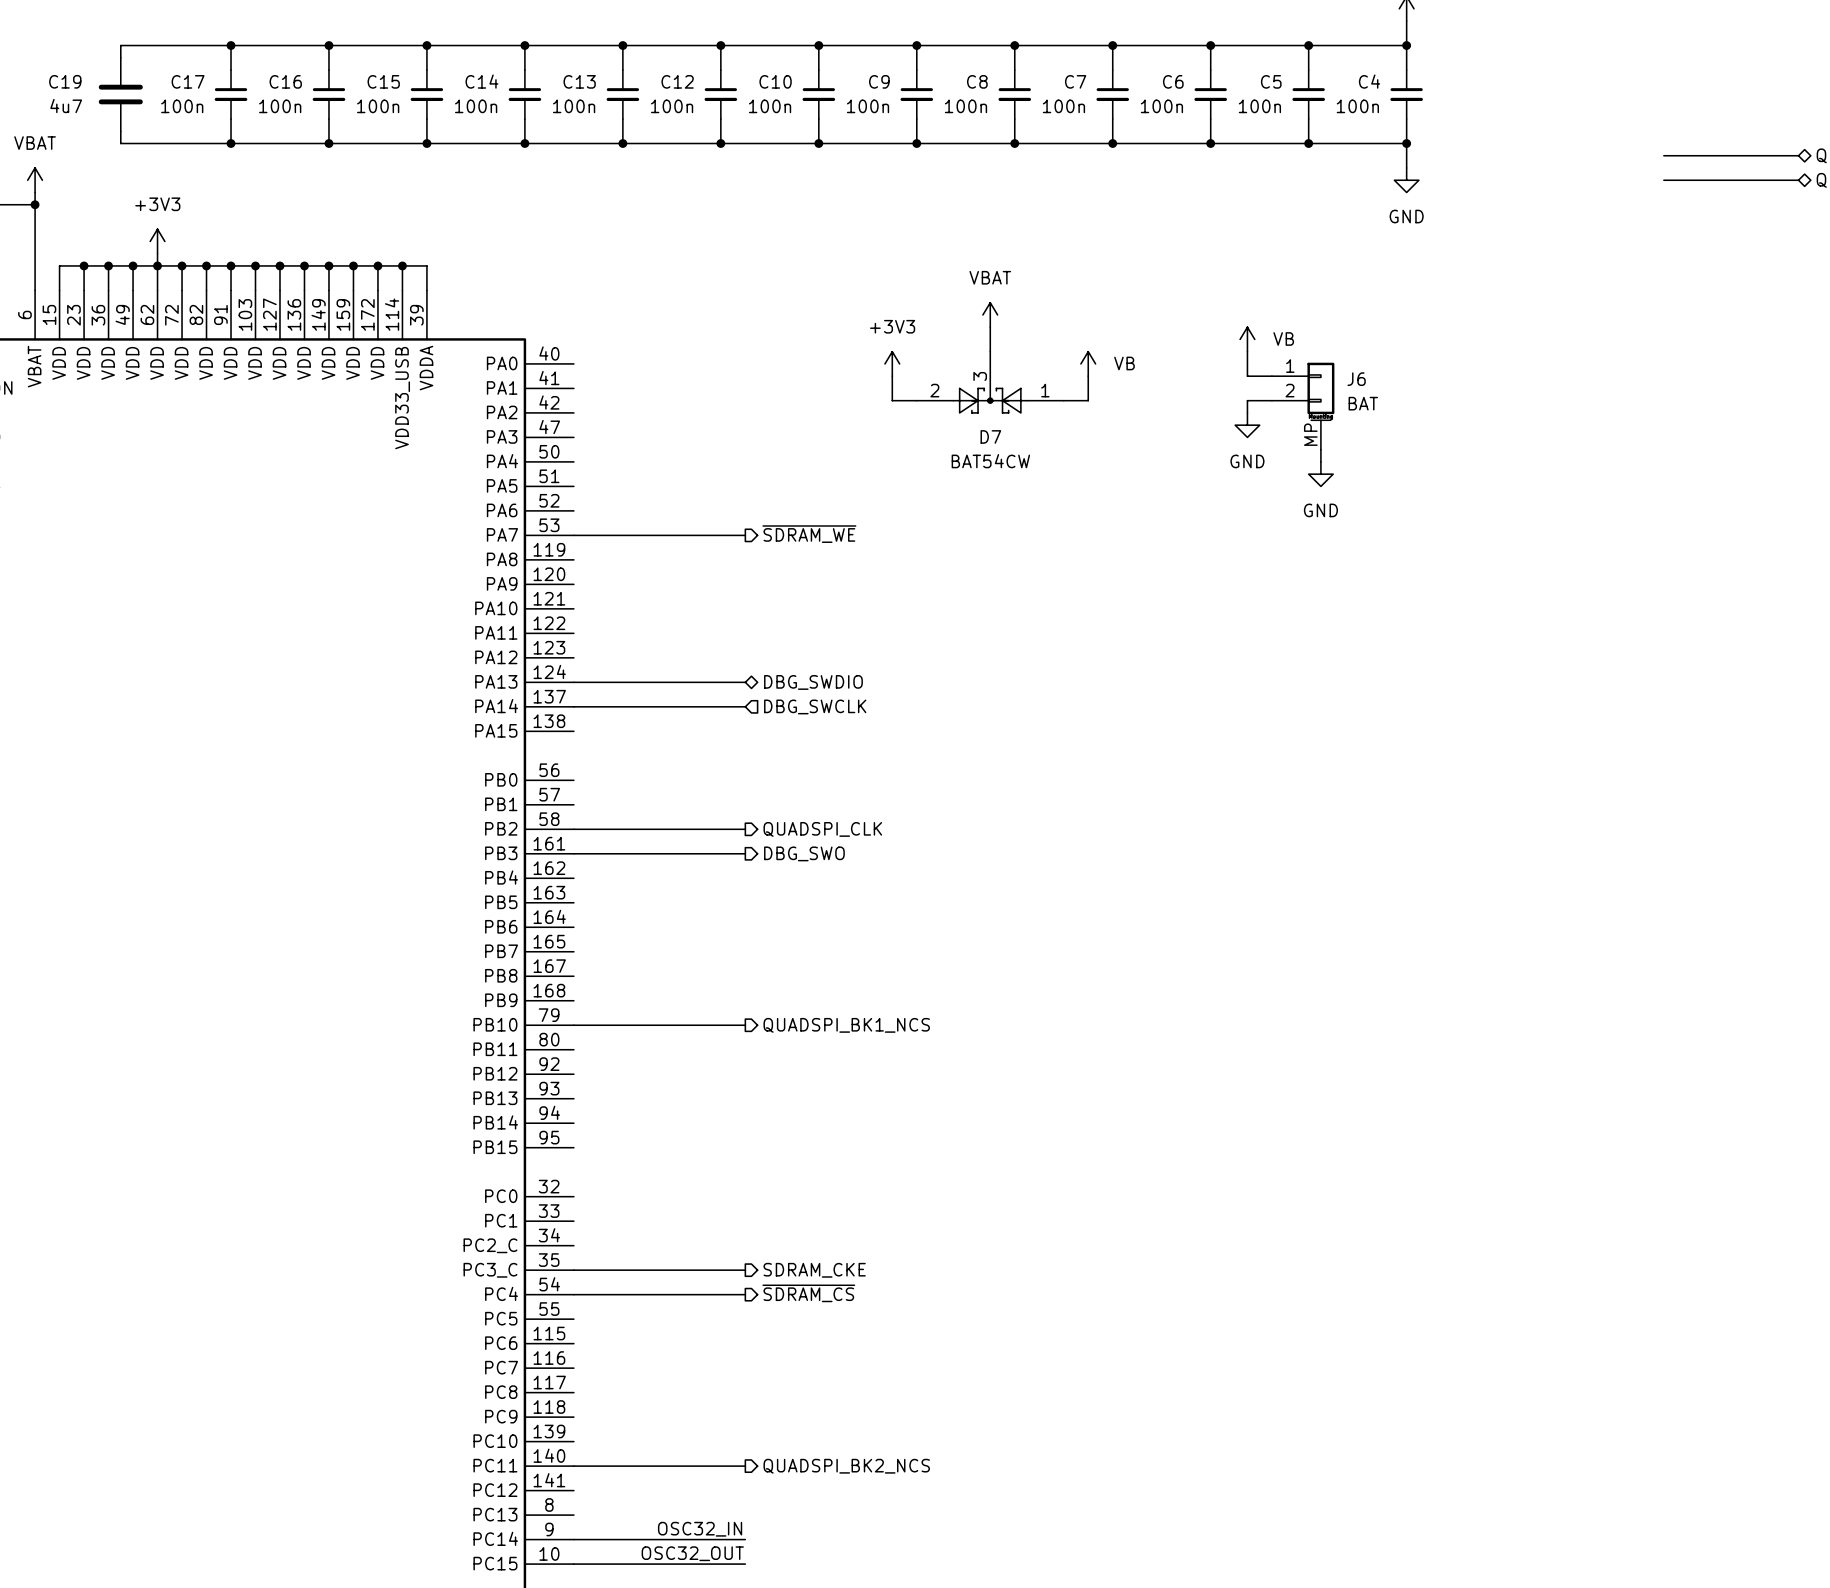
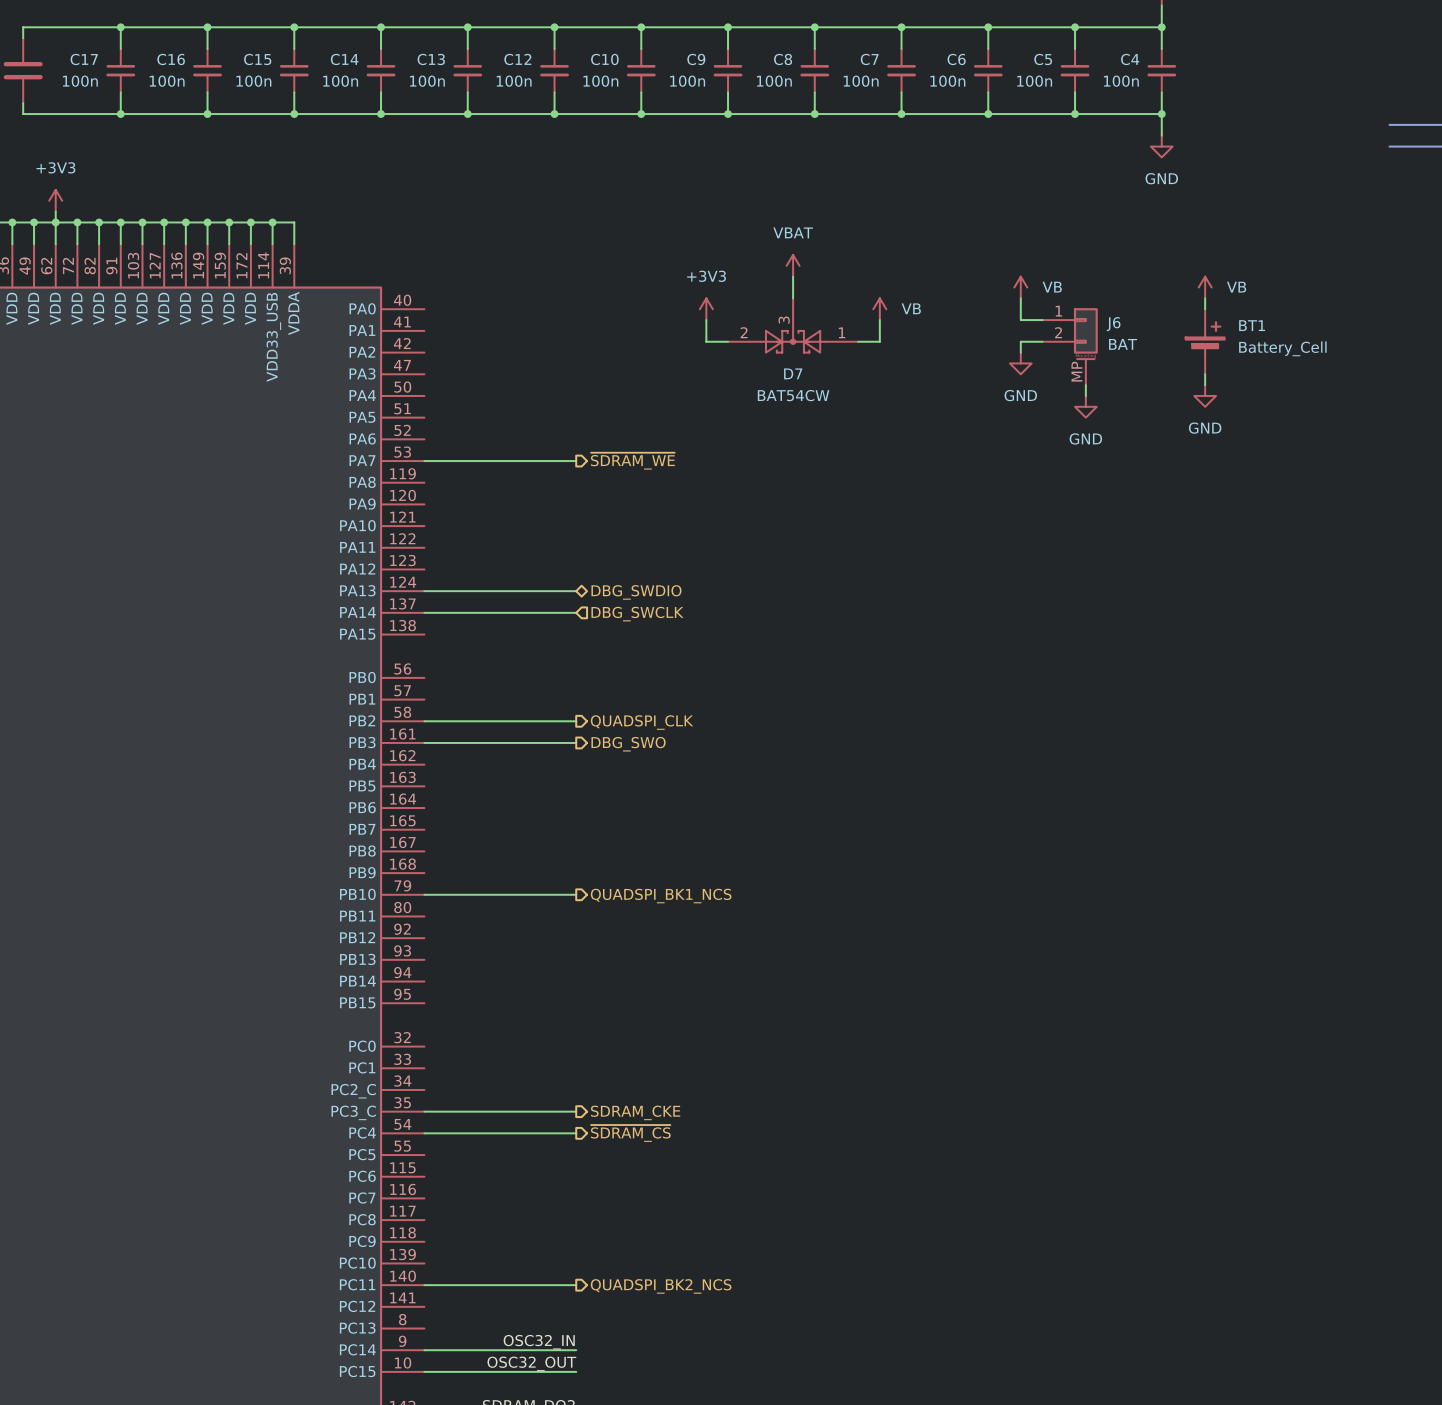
power symbol: none -> VB (1205, 287)
wire: none -> (1205, 298) (1205, 309)
BT1: none -> Battery_Cell (1205, 341)
wire: none -> (1205, 374) (1205, 385)
power symbol: none -> GND (1205, 395)

